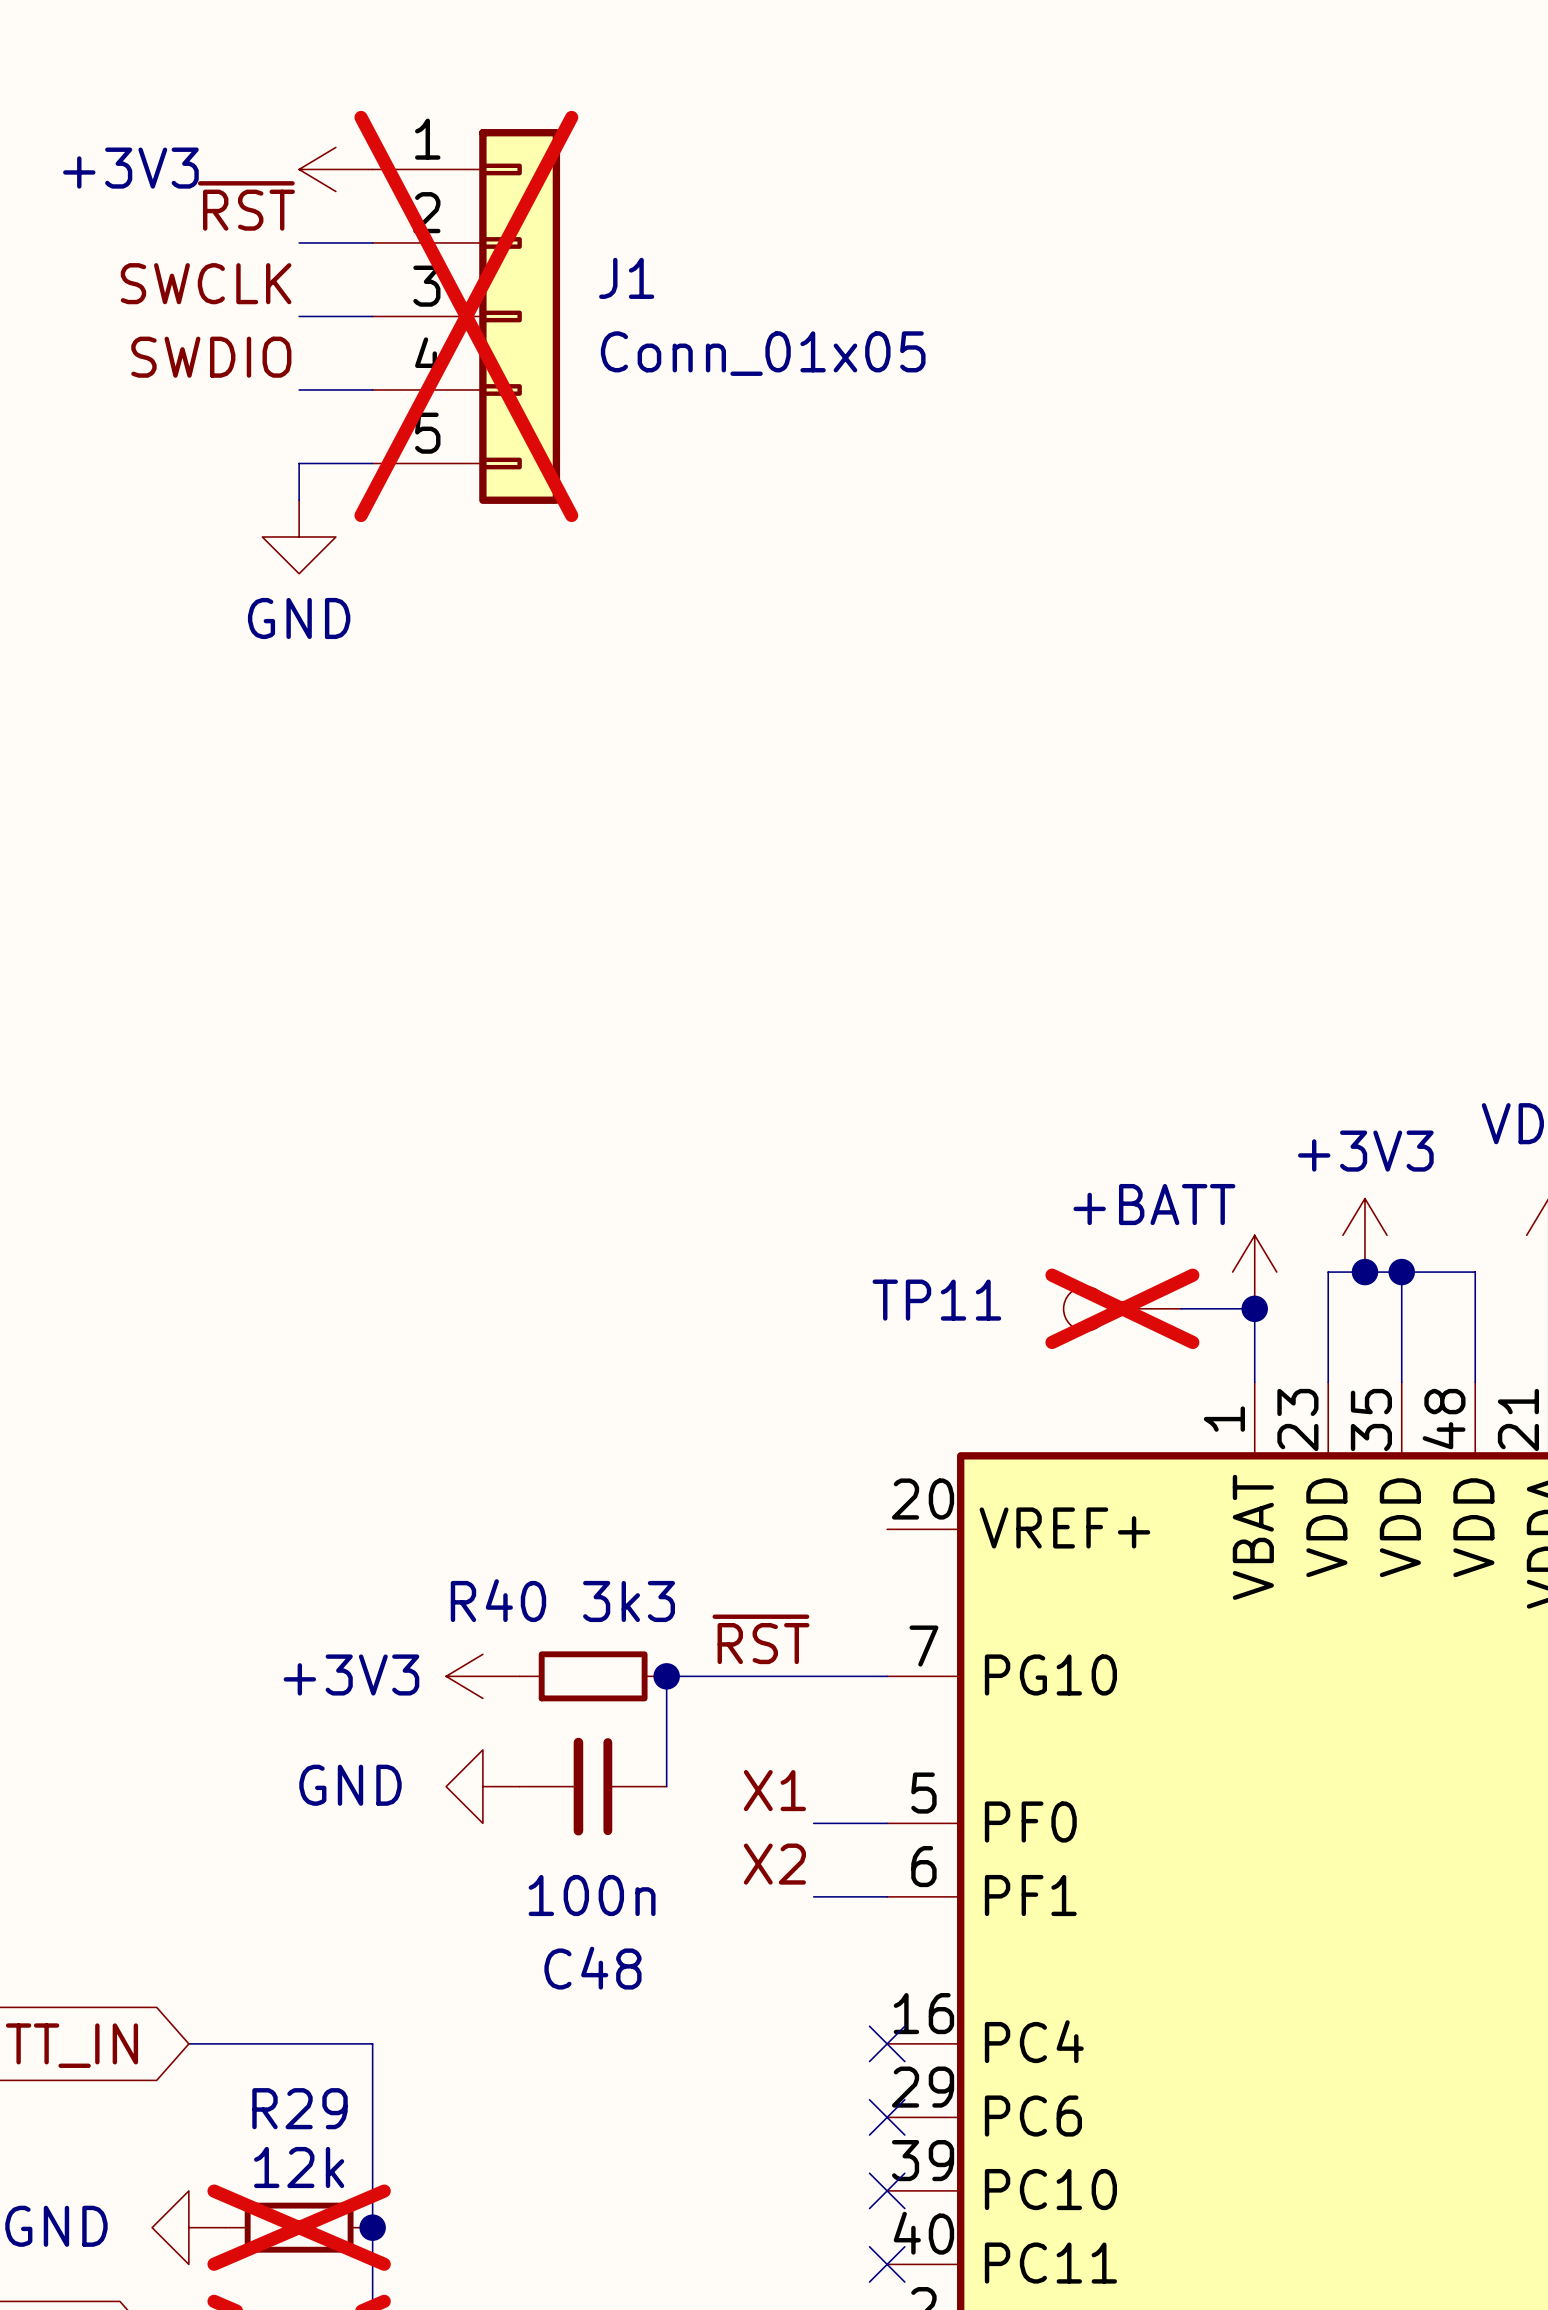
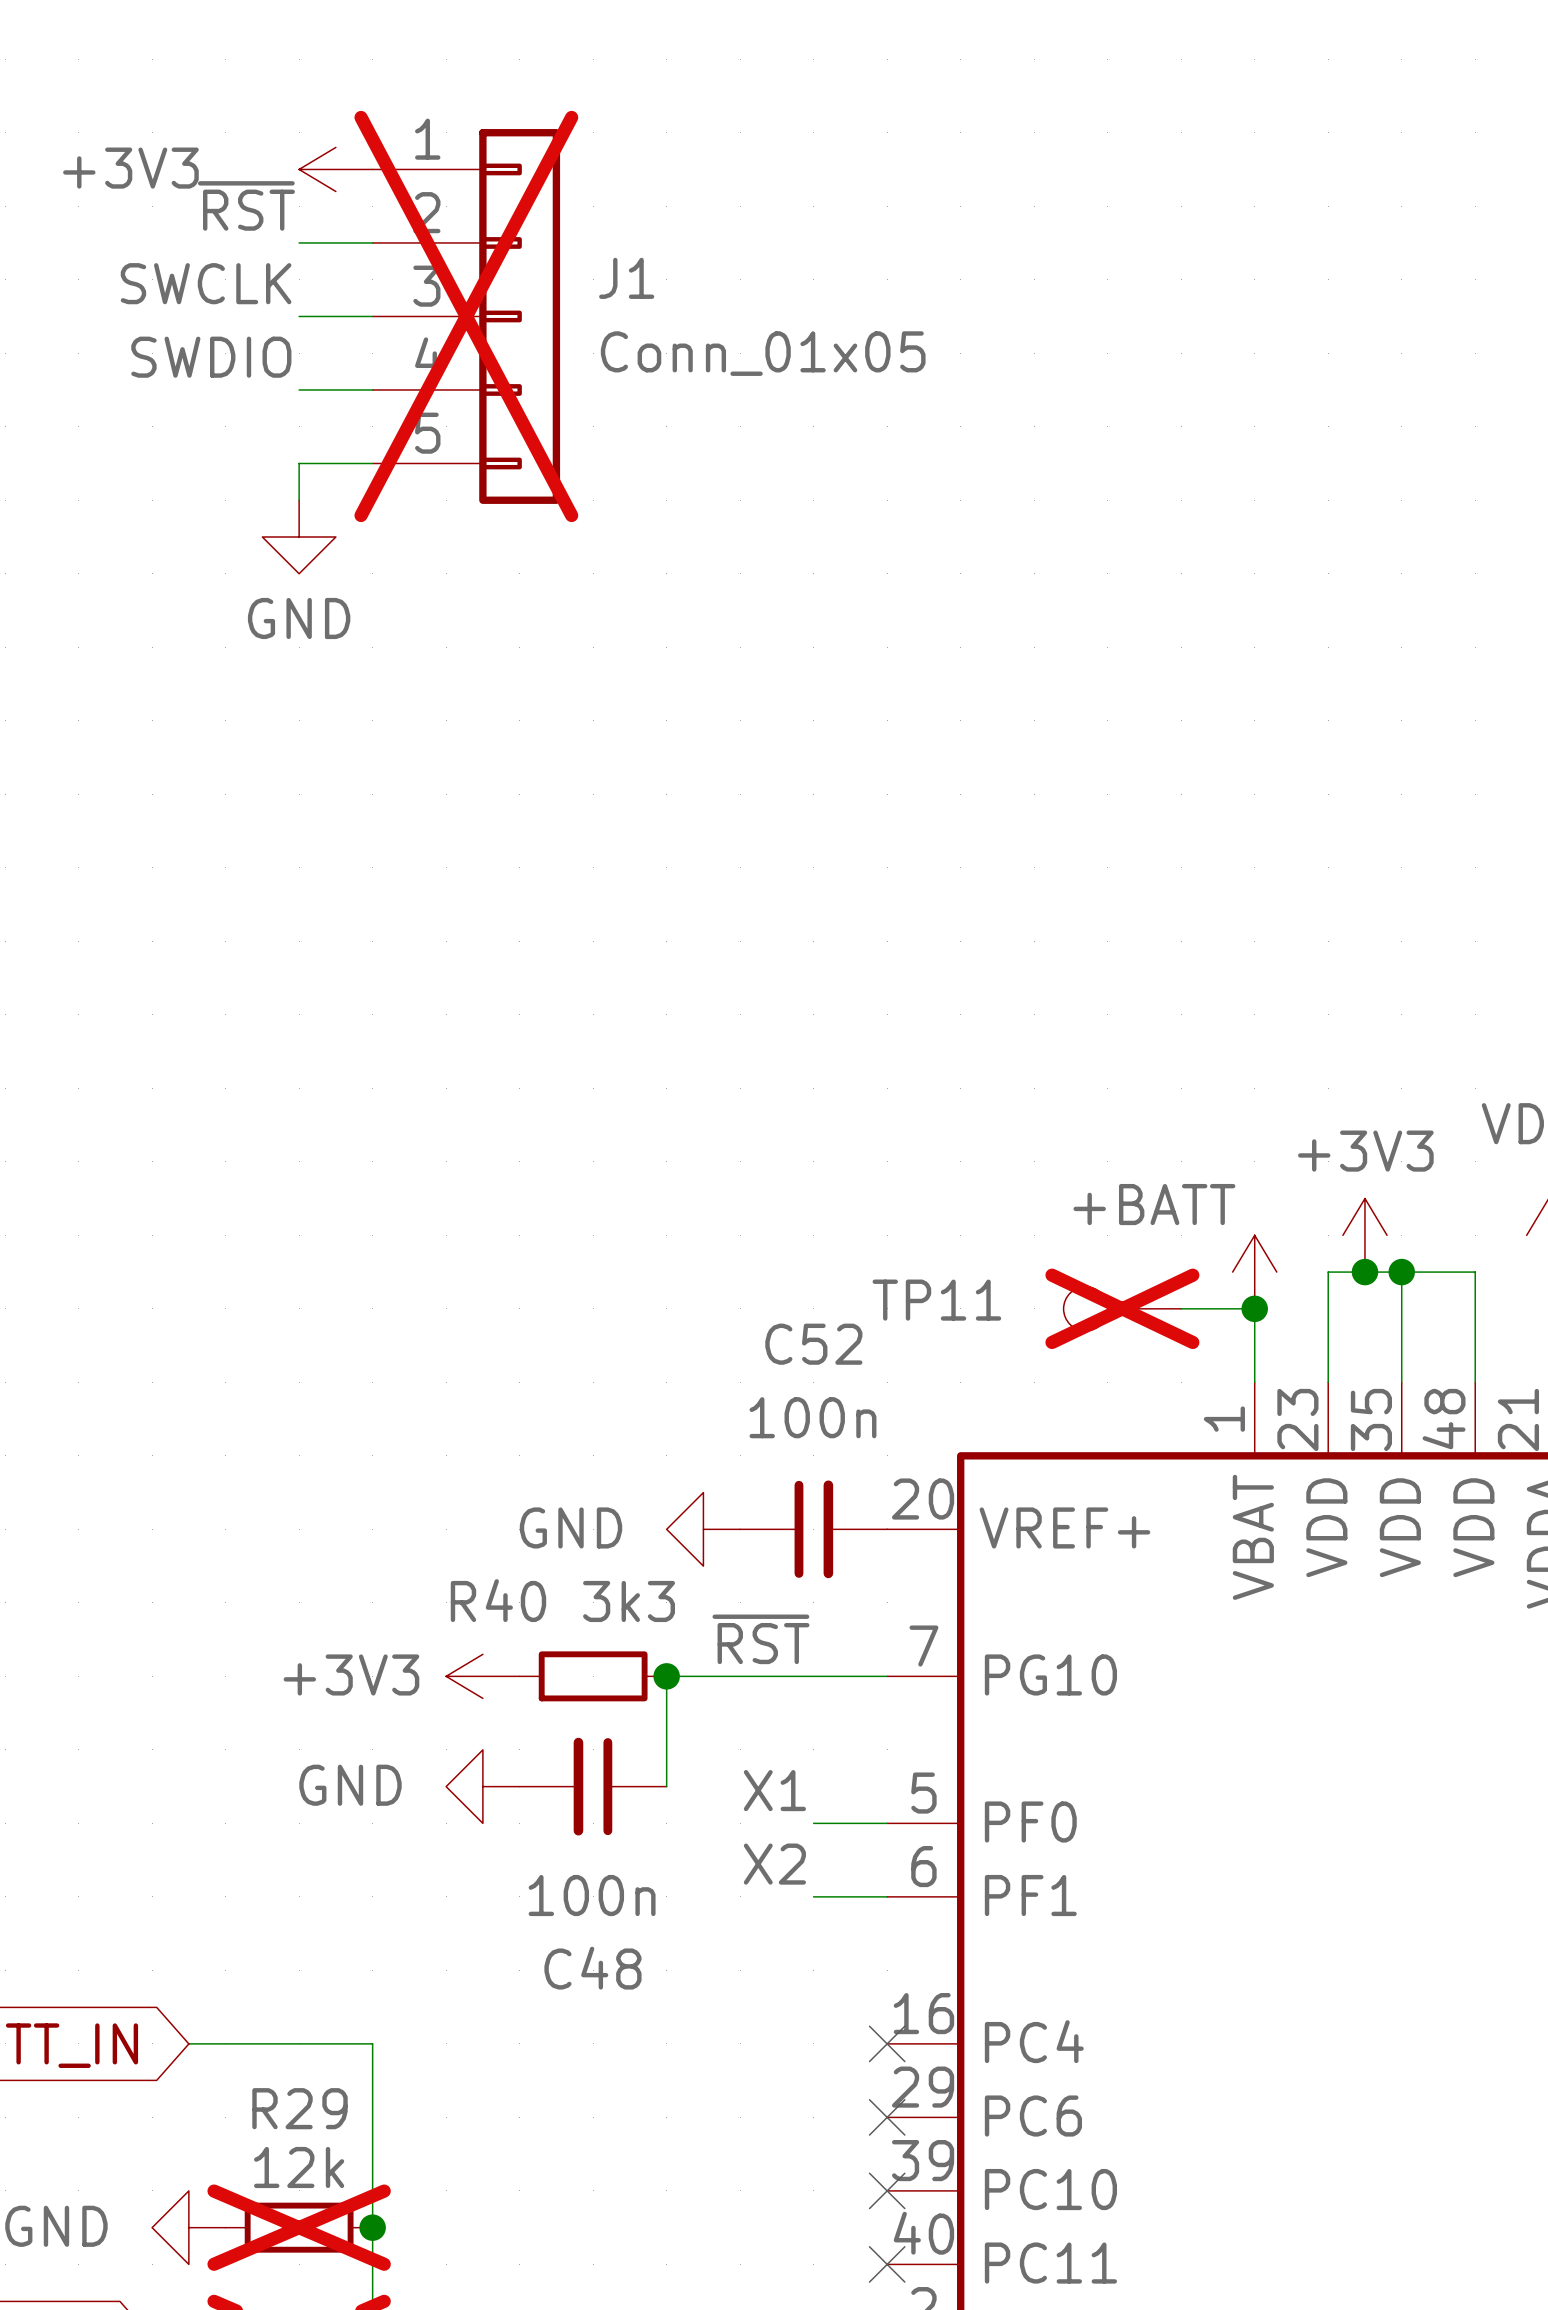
power symbol: none -> GND (703, 1529)
C52: none -> 100n (813, 1529)

